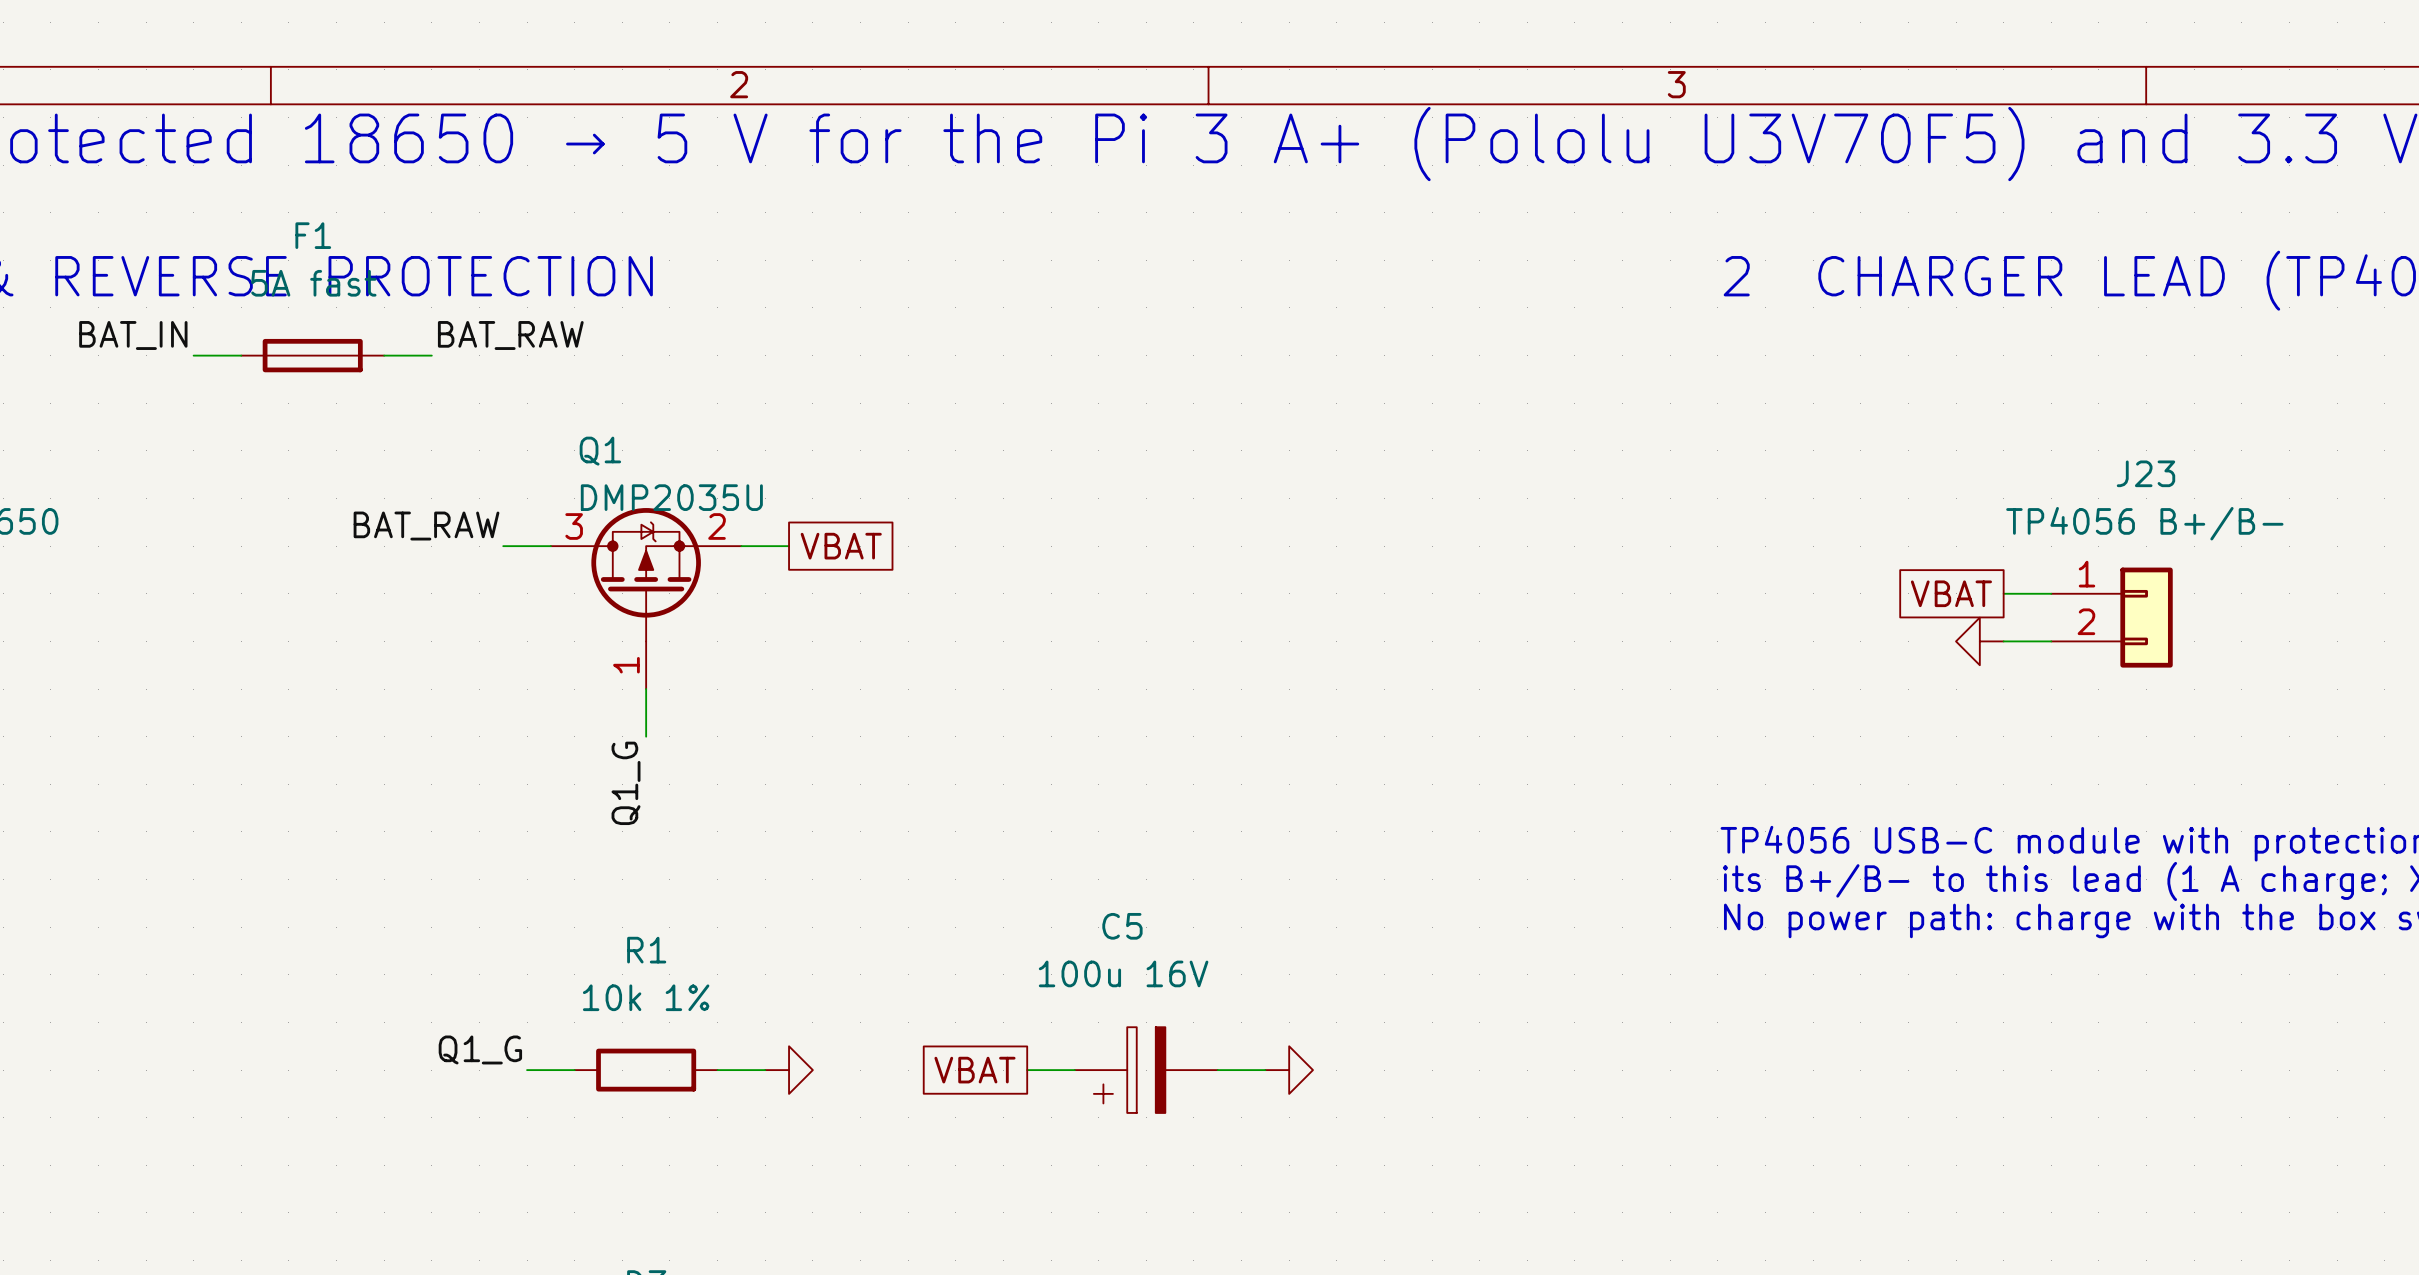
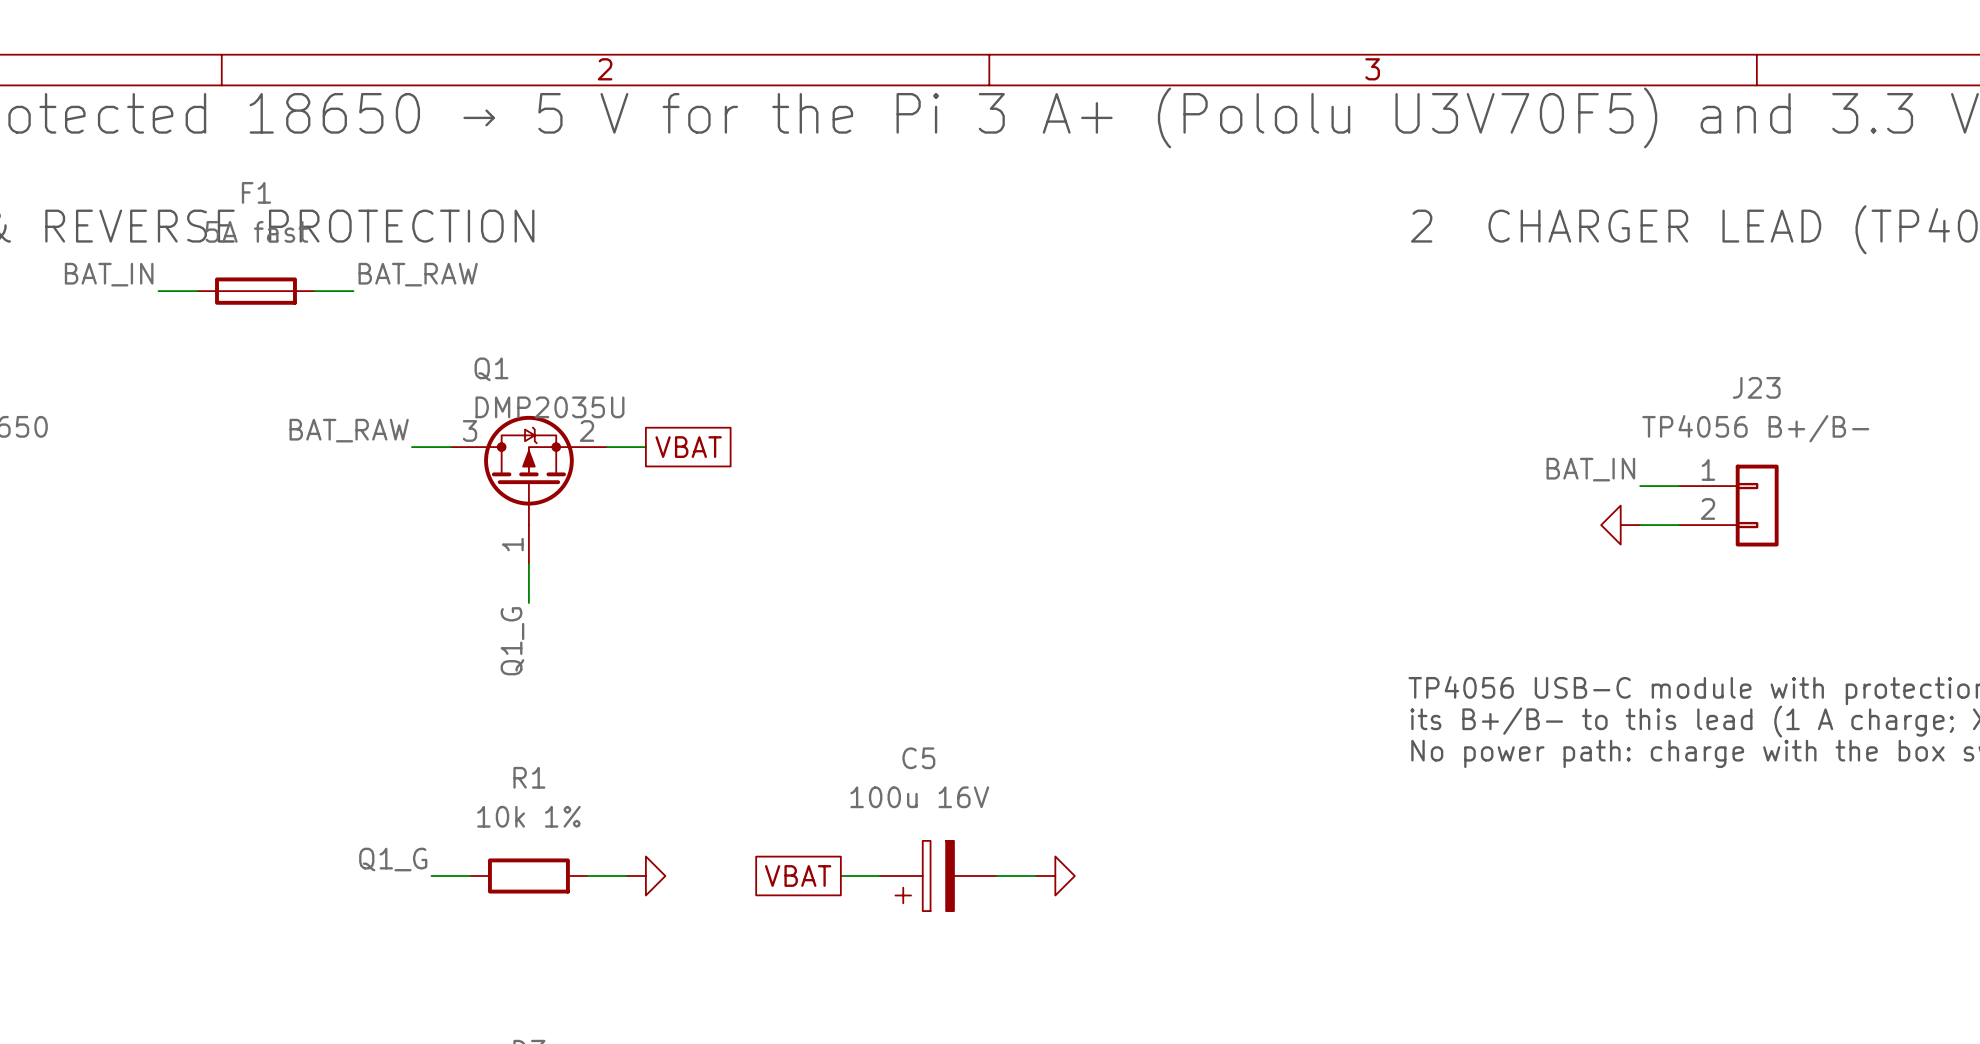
label: none -> BAT_IN (1590, 469)
global label: VBAT (1951, 593) -> none

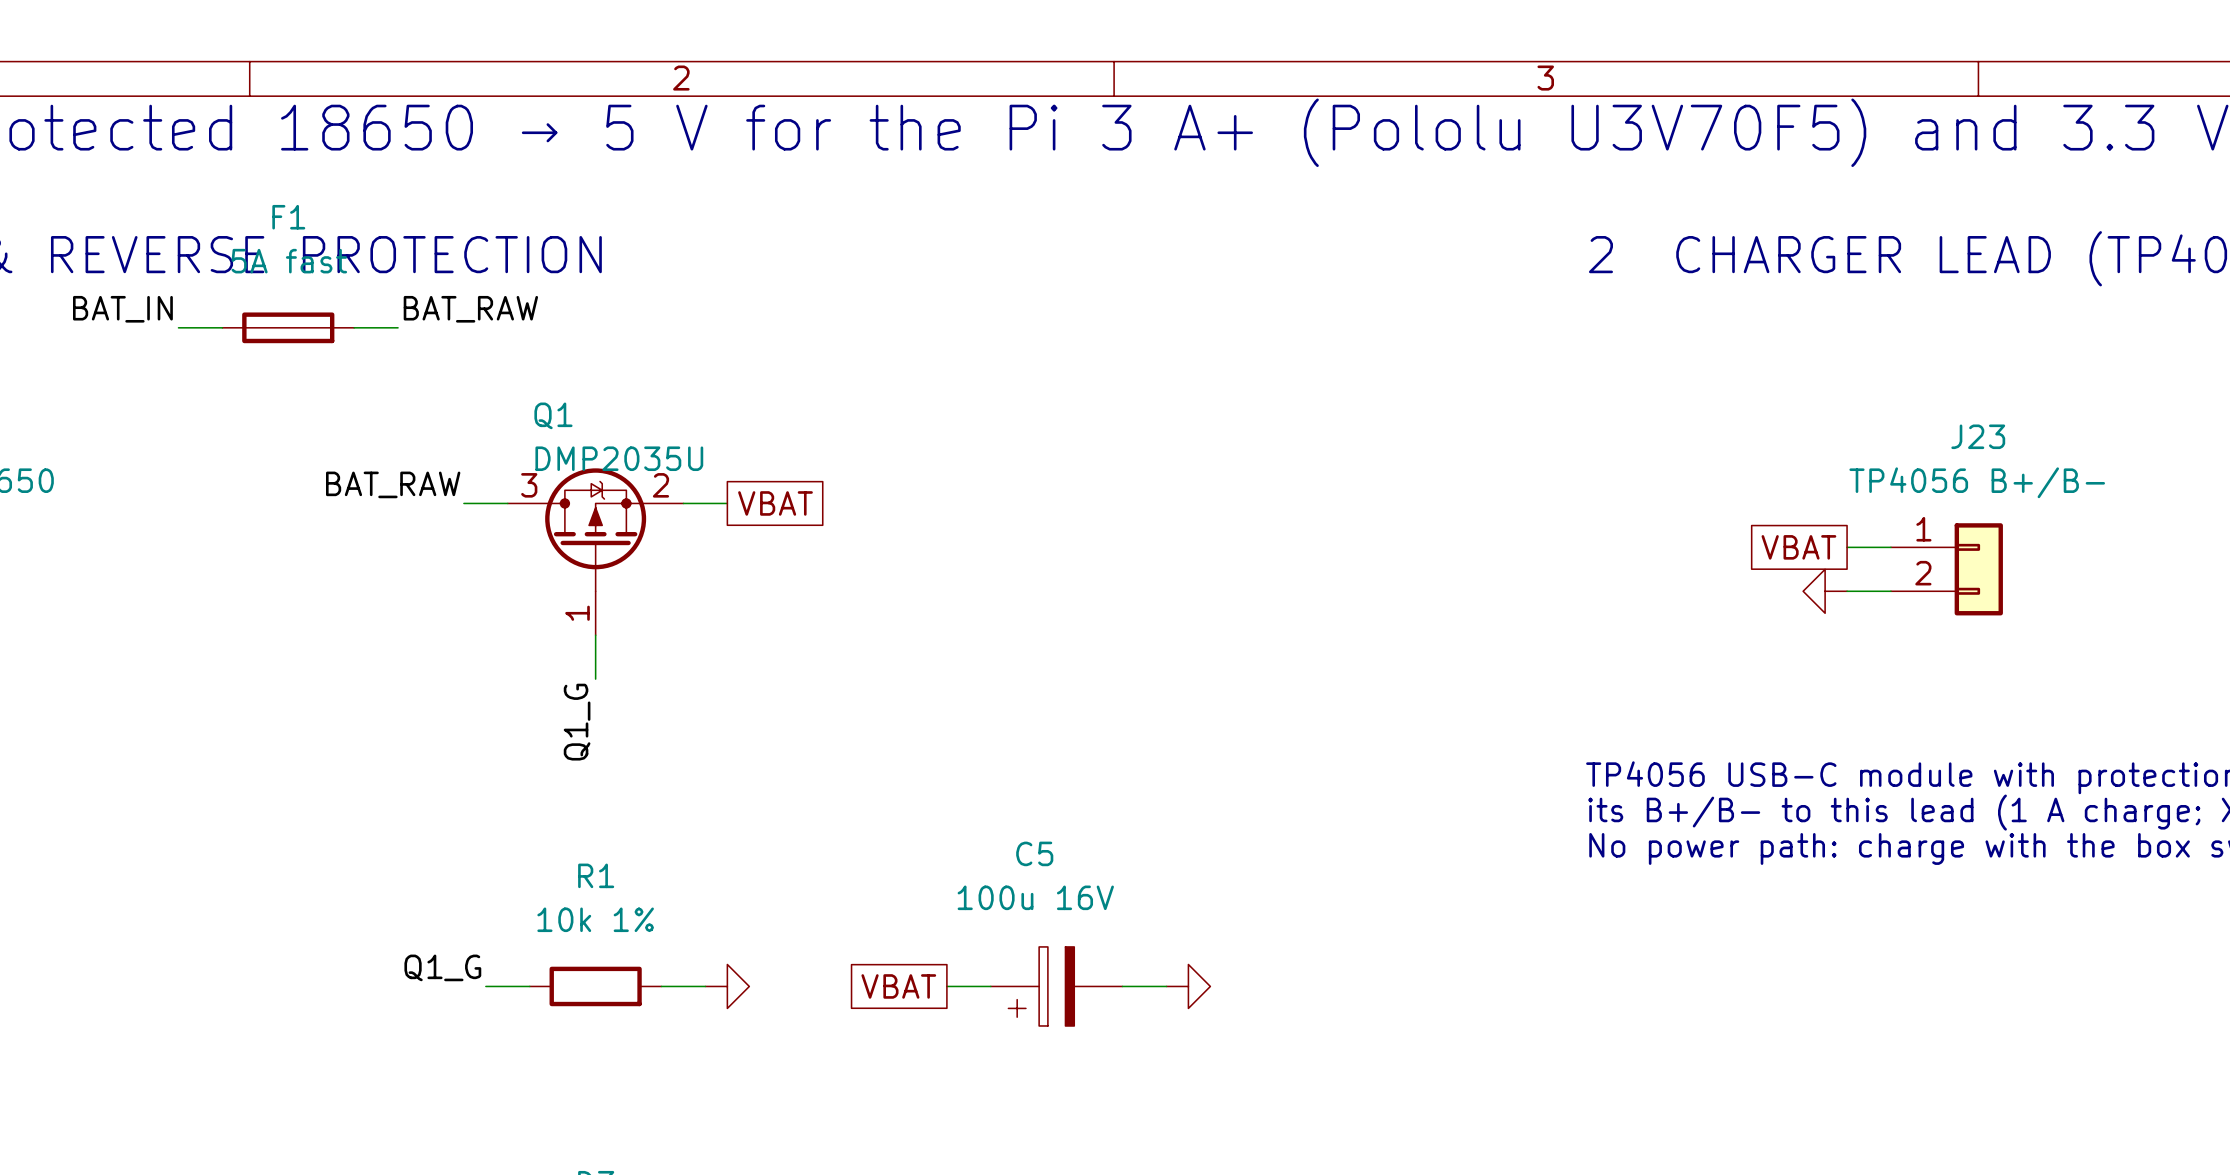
label: BAT_IN (1590, 469) -> none
global label: none -> VBAT (1798, 547)

